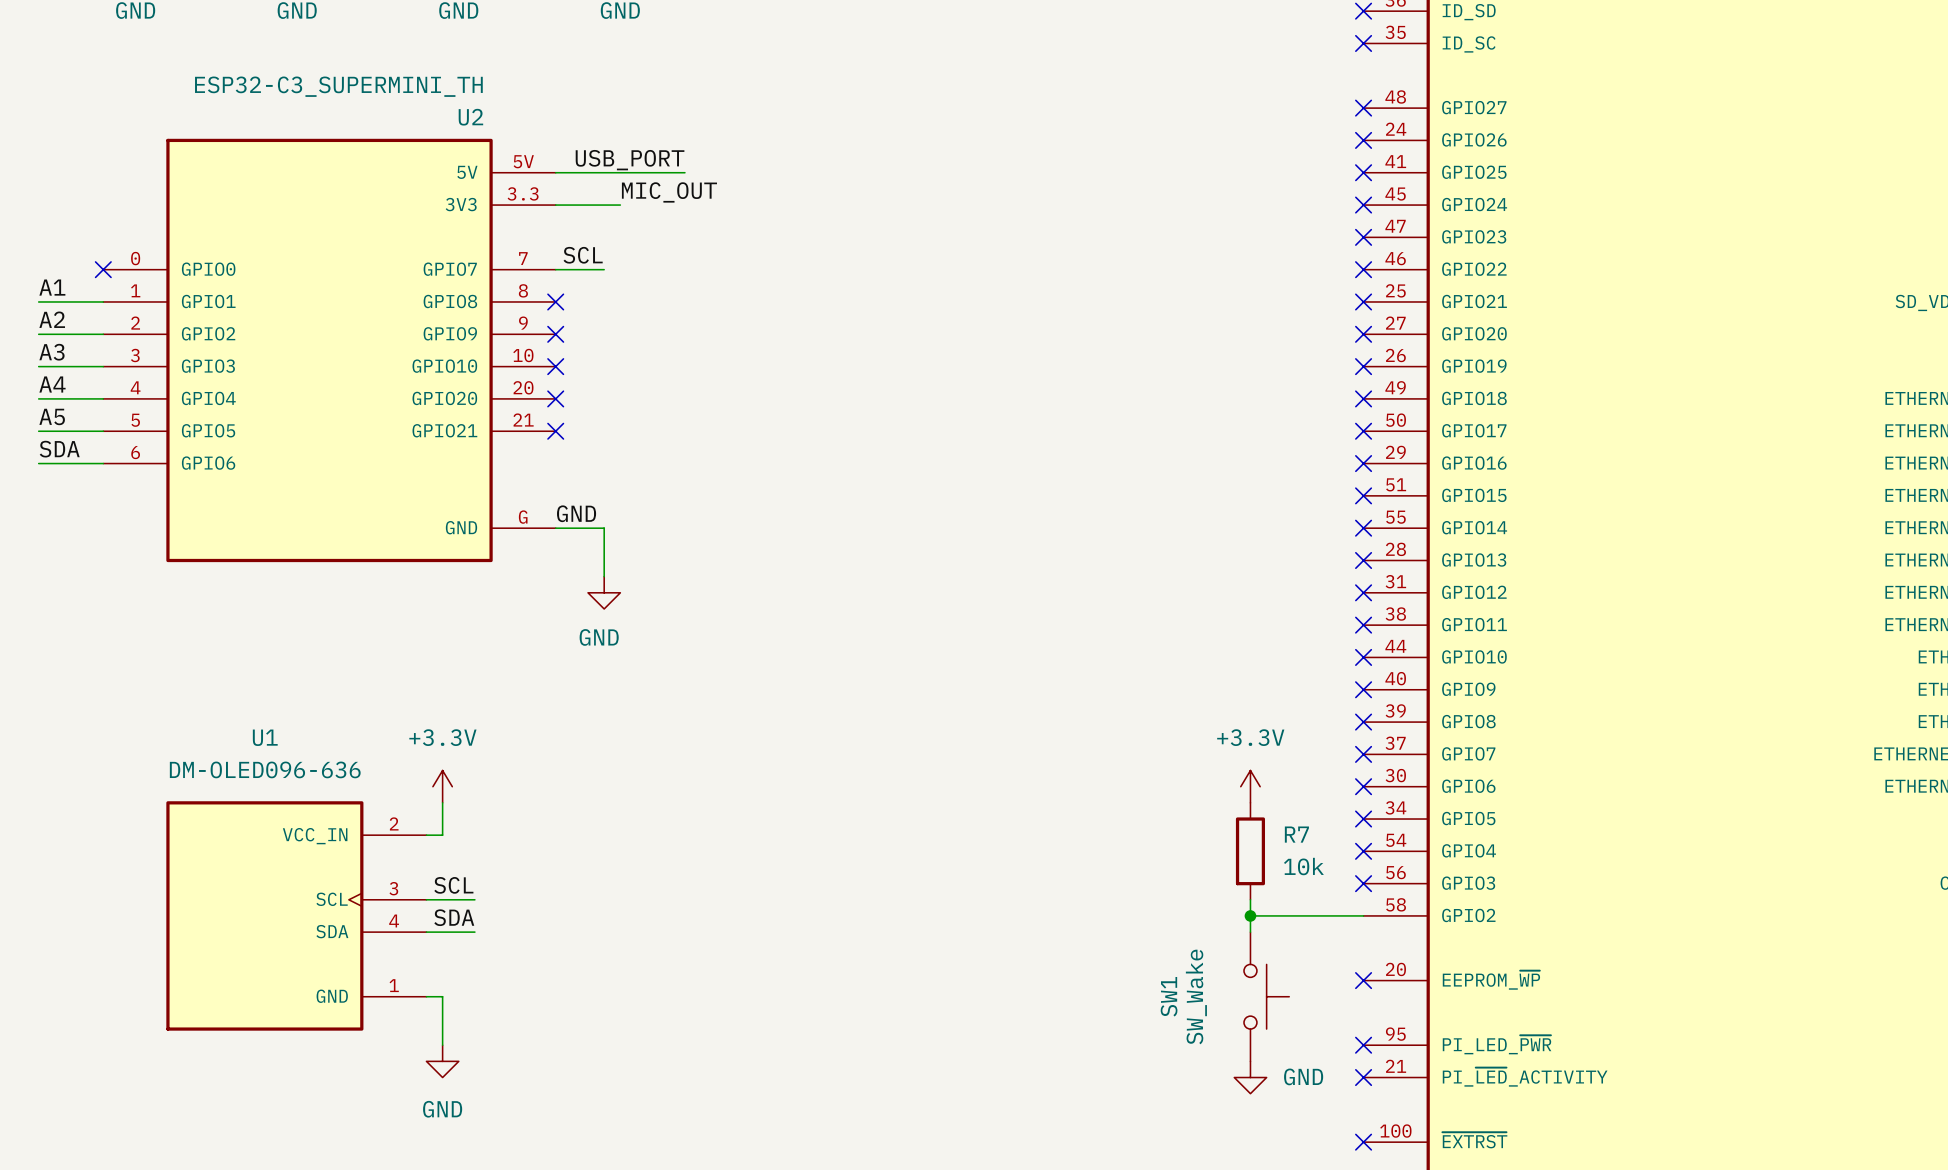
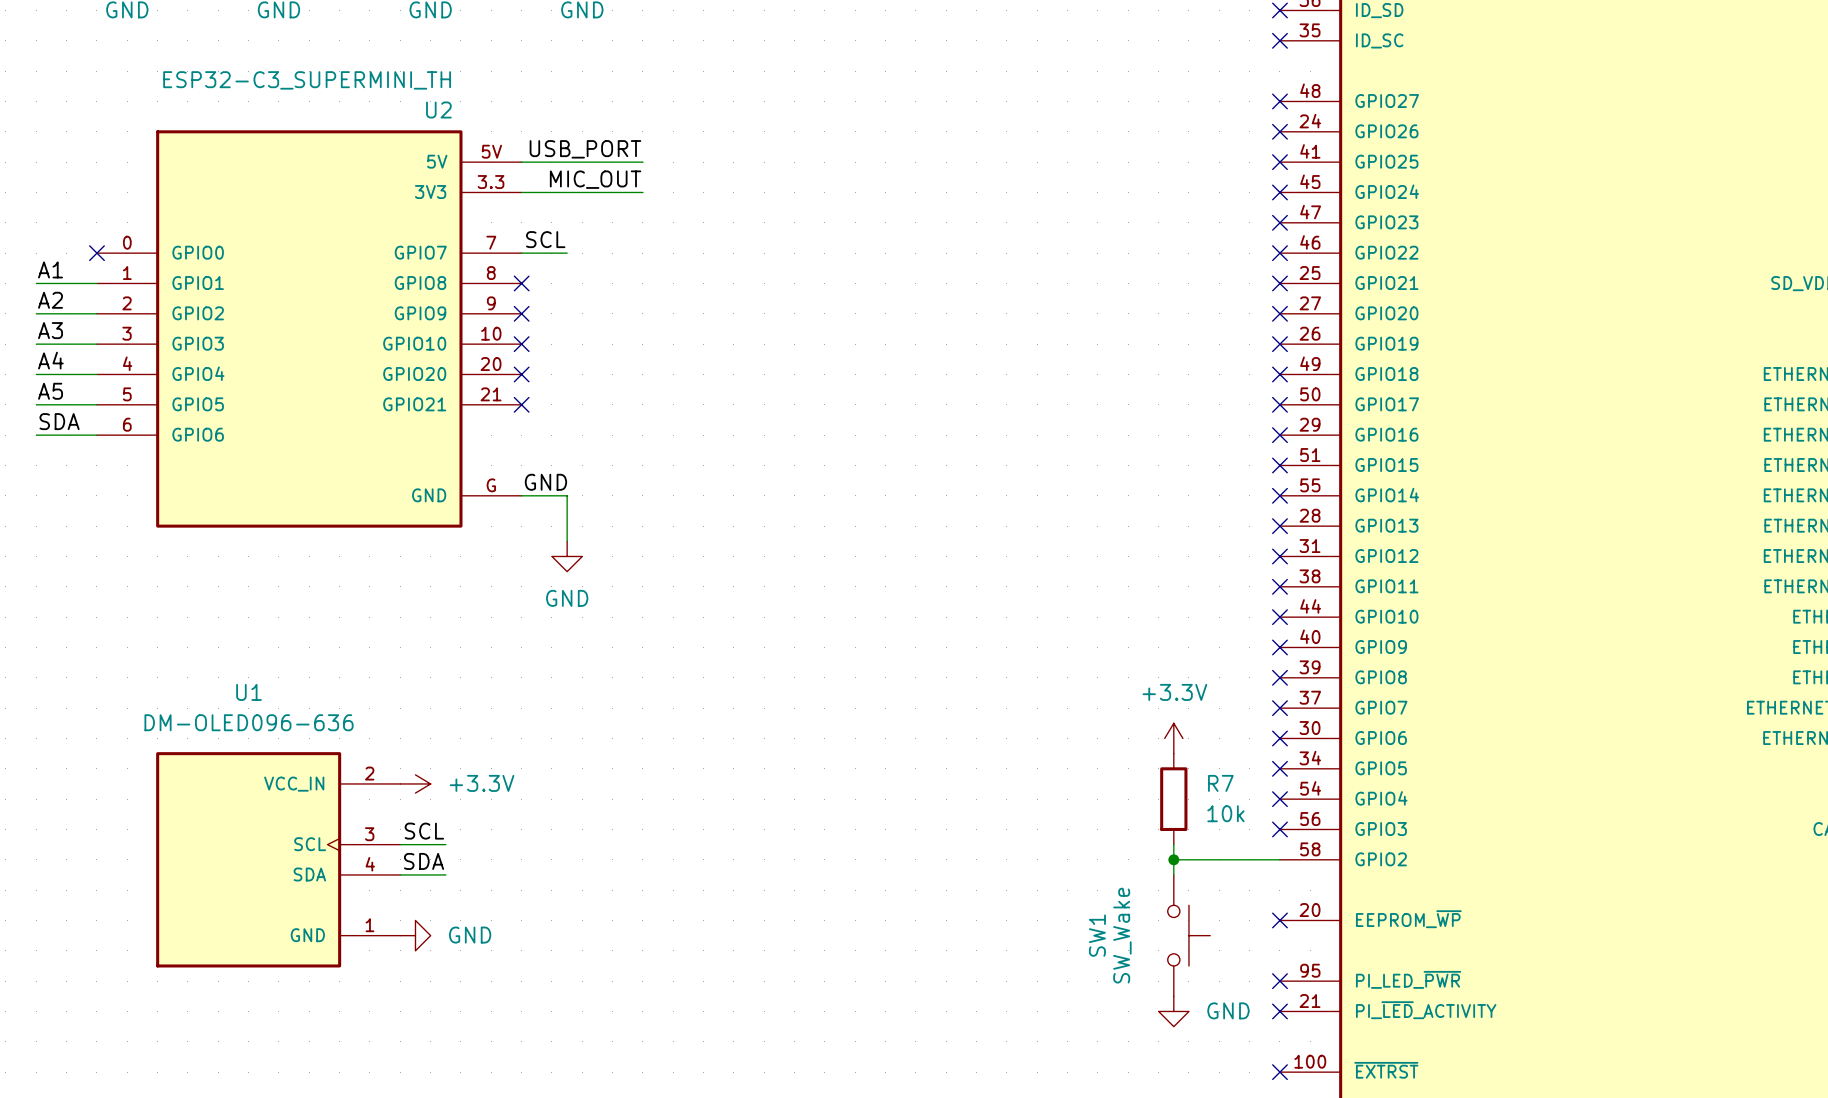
label position: MIC_OUT (669, 192) -> MIC_OUT (595, 179)
wire: none -> (582, 192) (642, 192)
power symbol text position: +3.3V (442, 737) -> +3.3V (482, 783)
power symbol rotation: 0° (442, 786) -> 90° clockwise (415, 783)
power symbol position: +3.3V (442, 786) -> +3.3V (415, 783)
wire: (442, 802) (442, 835) (426, 835) -> none
wire: (426, 996) (442, 996) (442, 1045) -> none
power symbol rotation: 0° (442, 1061) -> 90° counterclockwise (415, 935)
power symbol position: GND (442, 1061) -> GND (415, 935)

